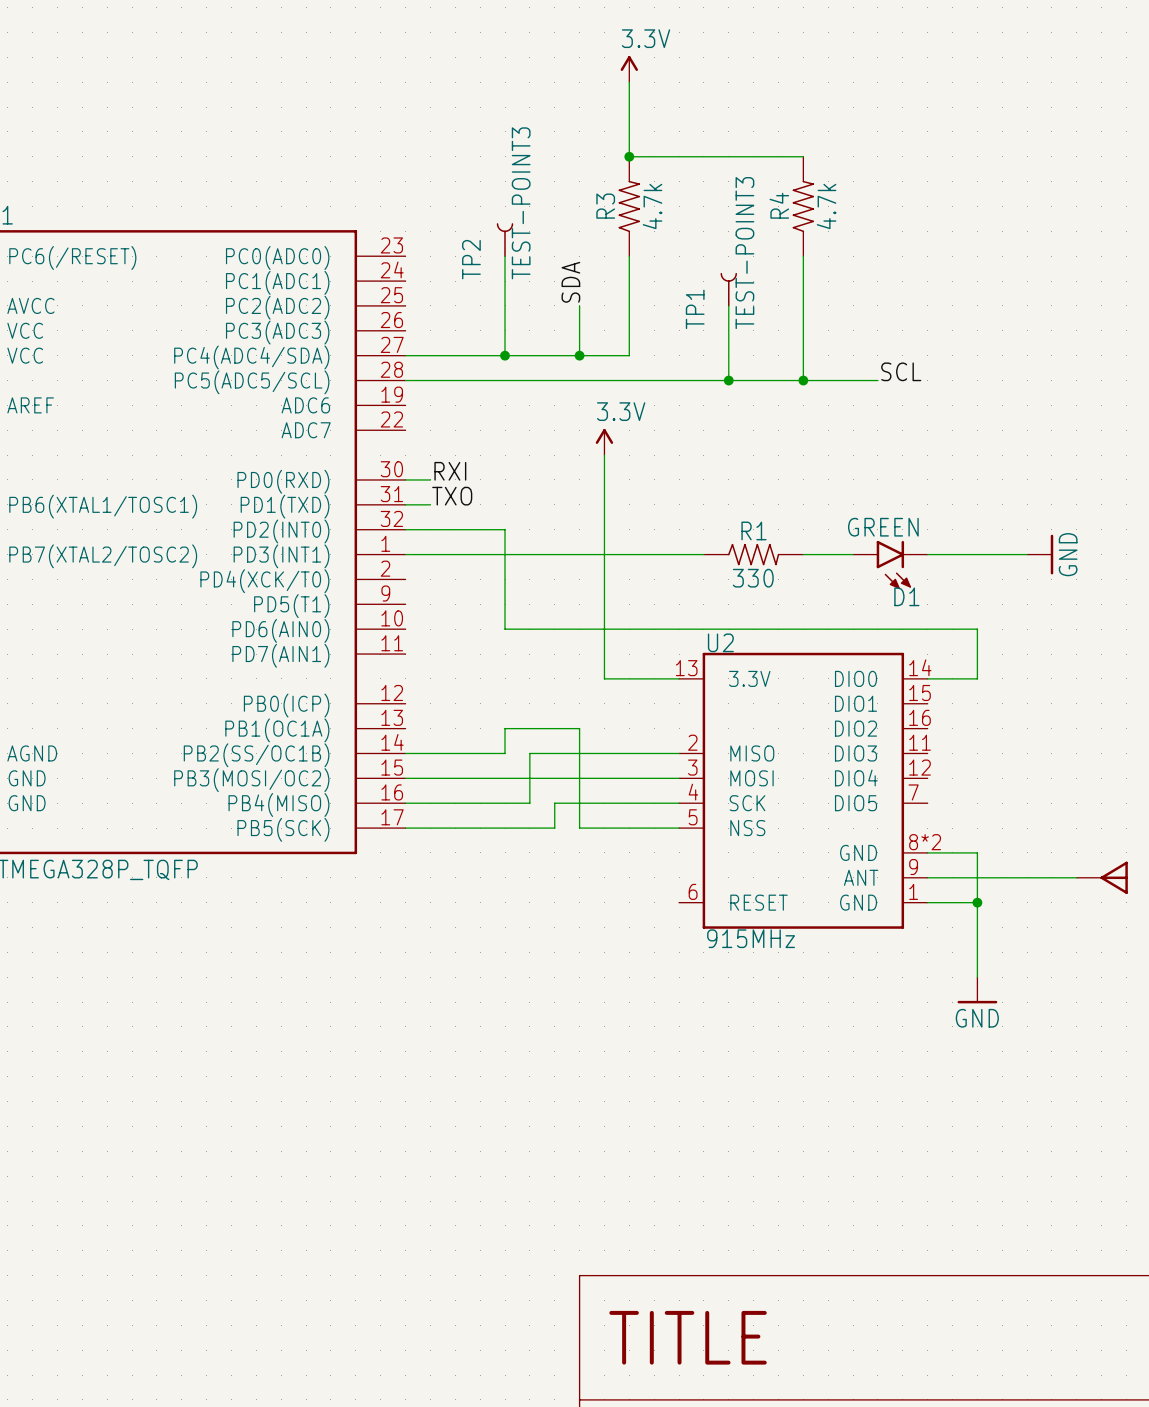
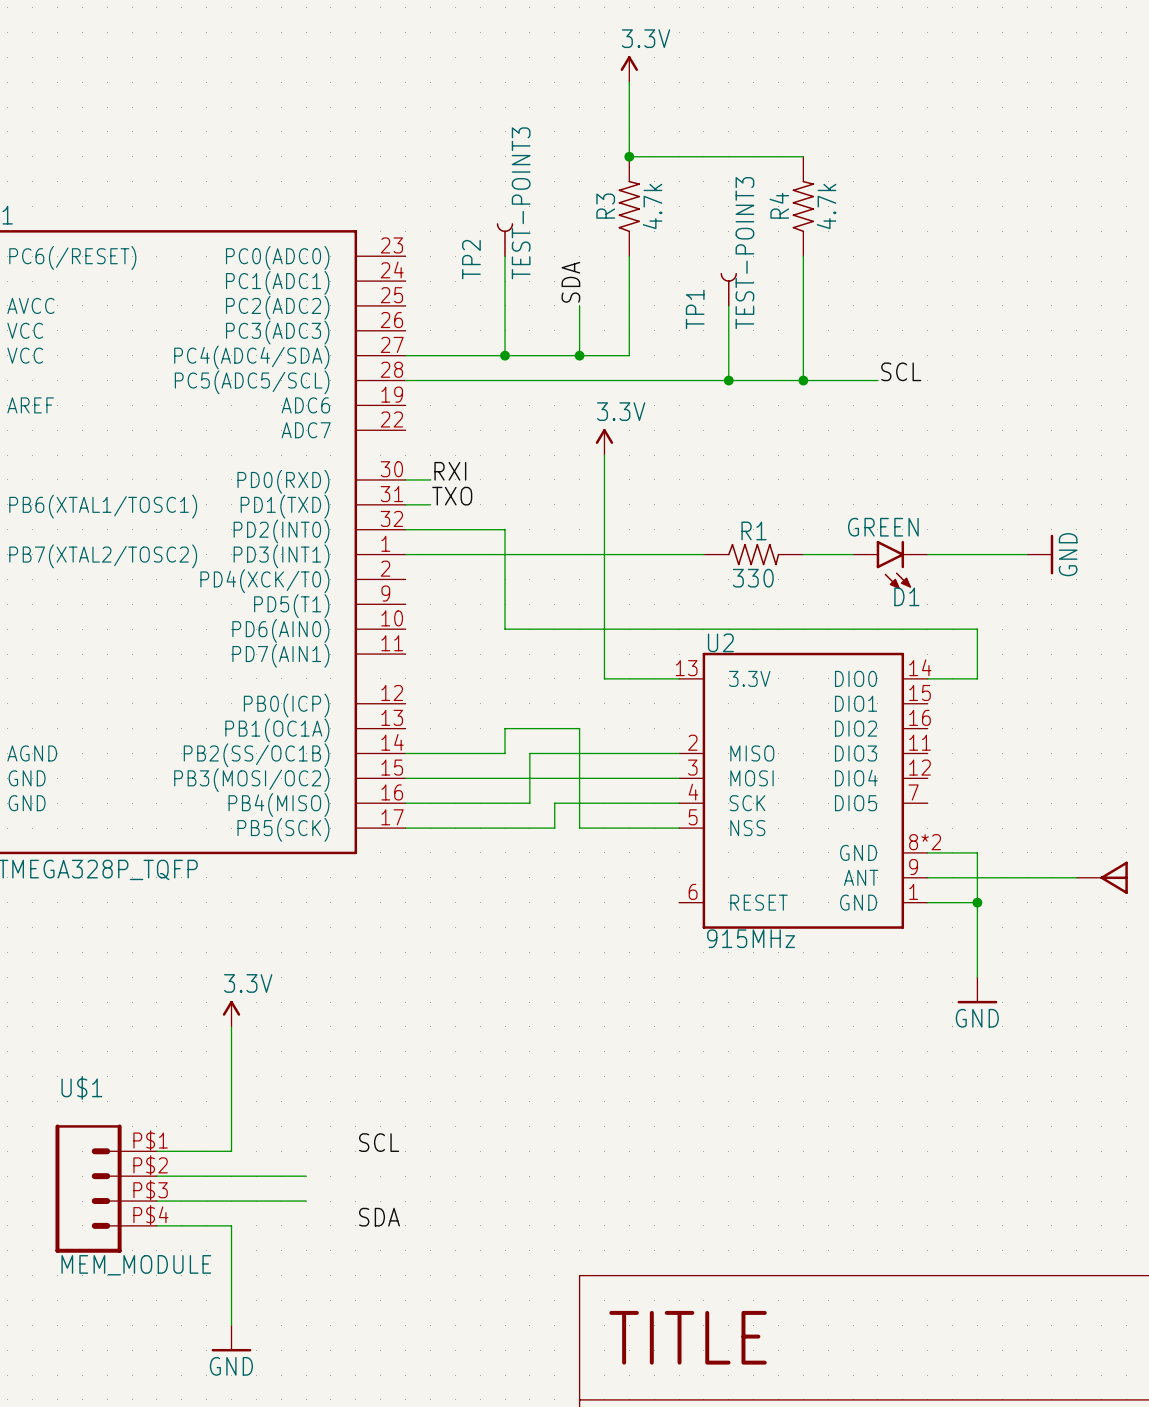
power symbol: none -> 3.3V (231, 1013)
wire: none -> (231, 1026) (231, 1151) (156, 1151)
label: none -> SCL (379, 1142)
wire: none -> (156, 1176) (306, 1176)
U$1: none -> MEM_MODULE (106, 1188)
wire: none -> (156, 1201) (306, 1201)
label: none -> SDA (379, 1217)
wire: none -> (156, 1225) (231, 1225) (231, 1325)
power symbol: none -> GND (231, 1338)

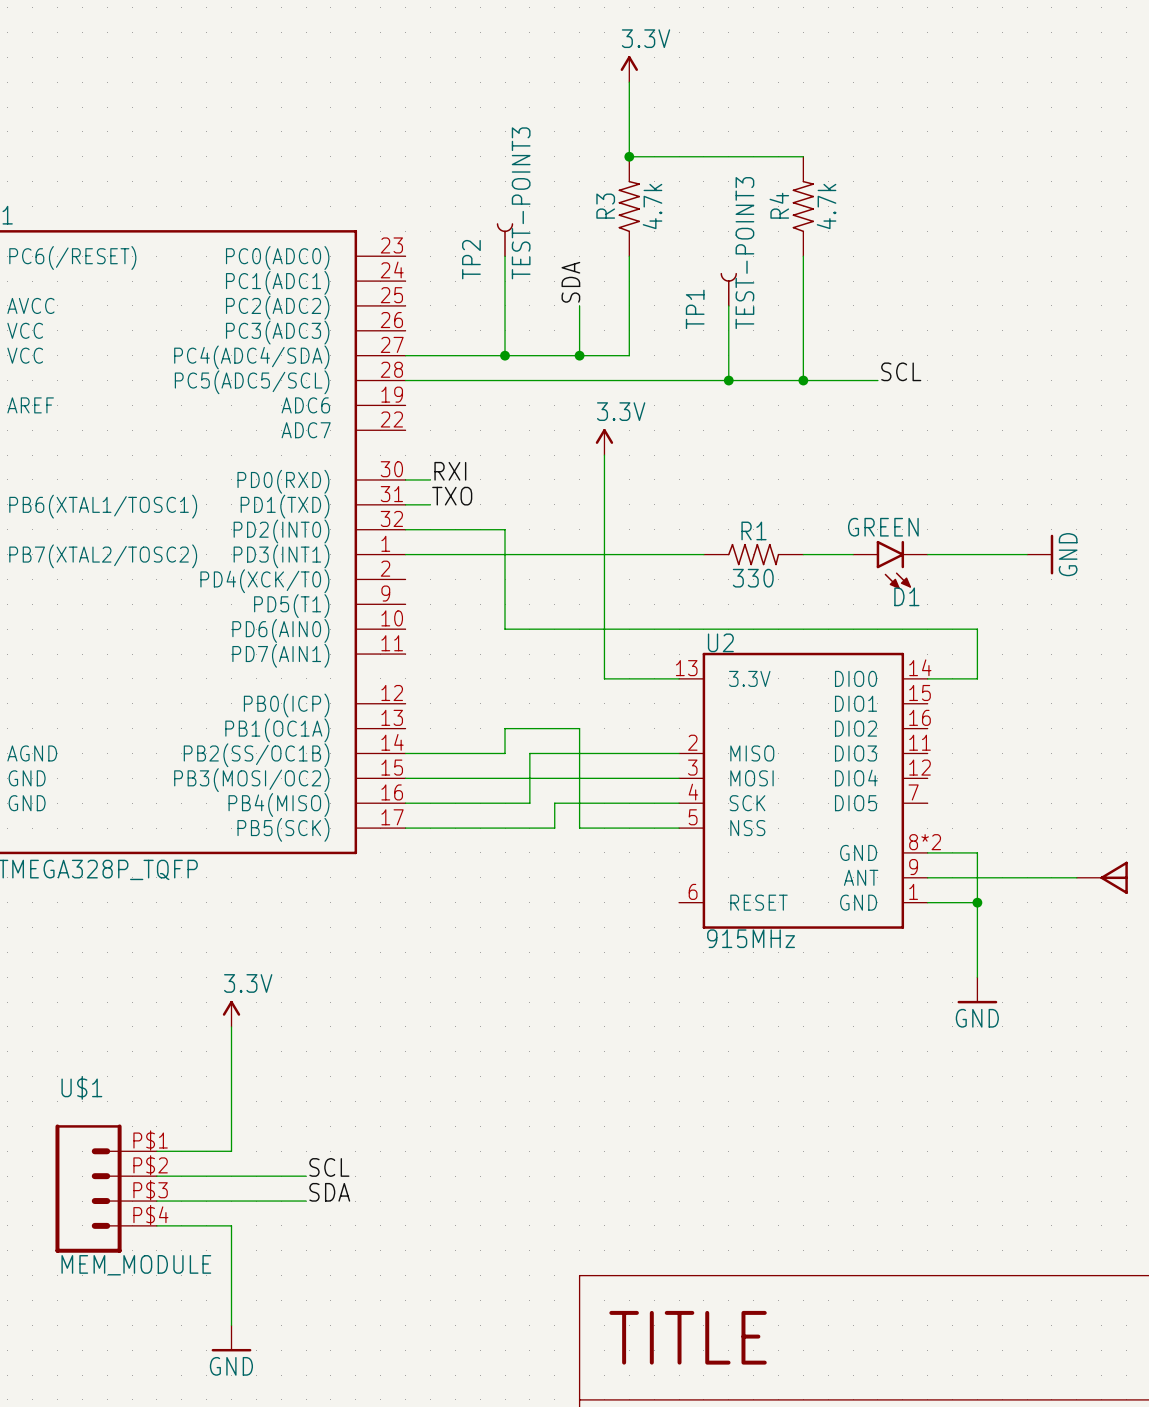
label position: SCL (379, 1142) -> SCL (329, 1167)
label position: SDA (379, 1217) -> SDA (329, 1192)

